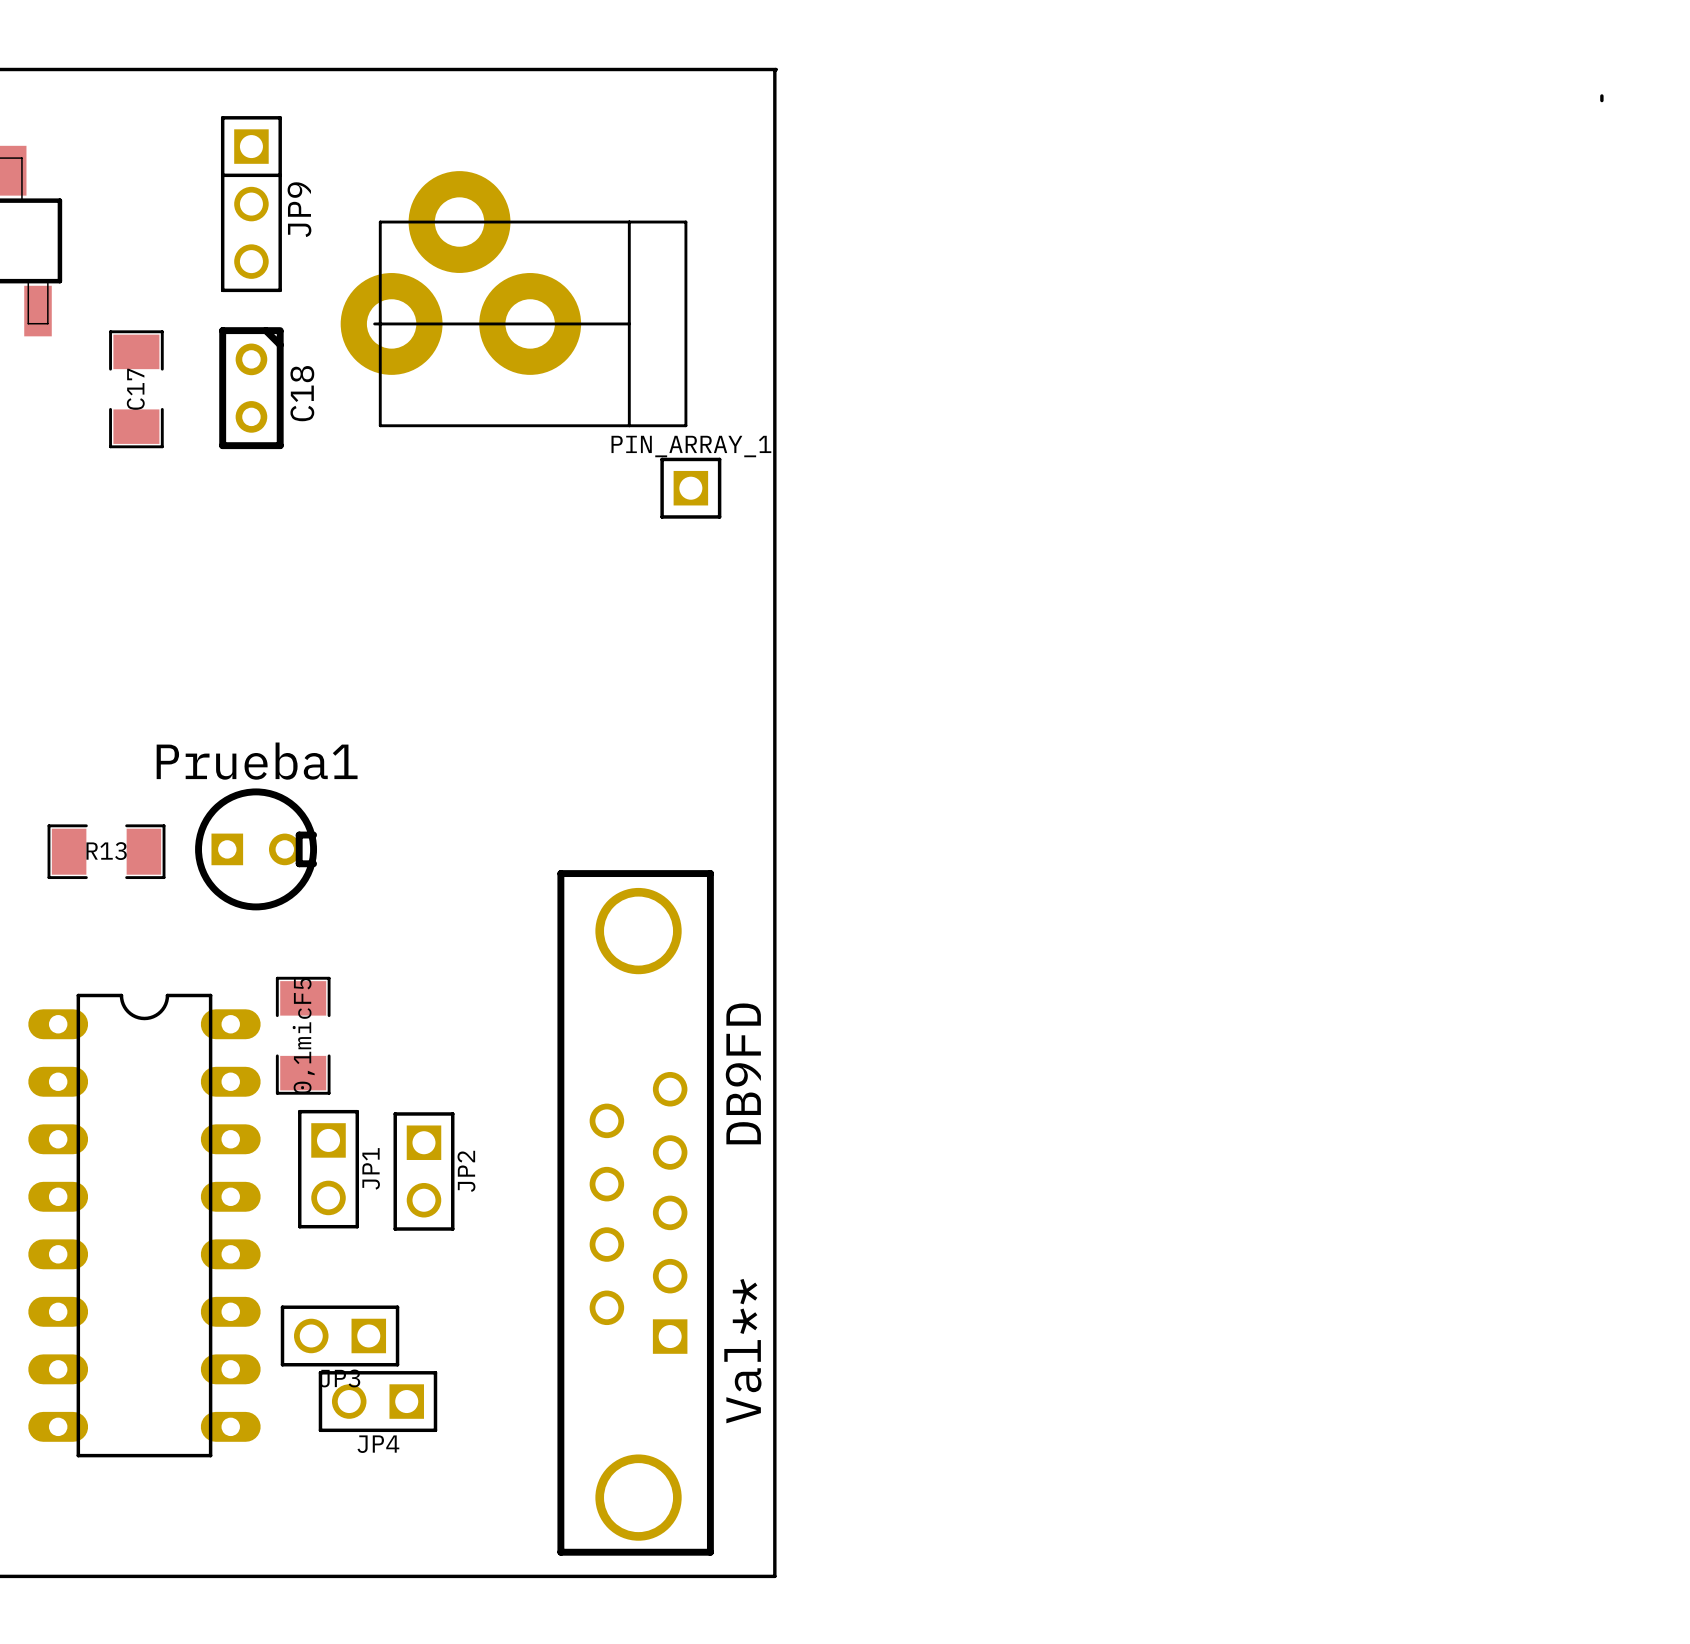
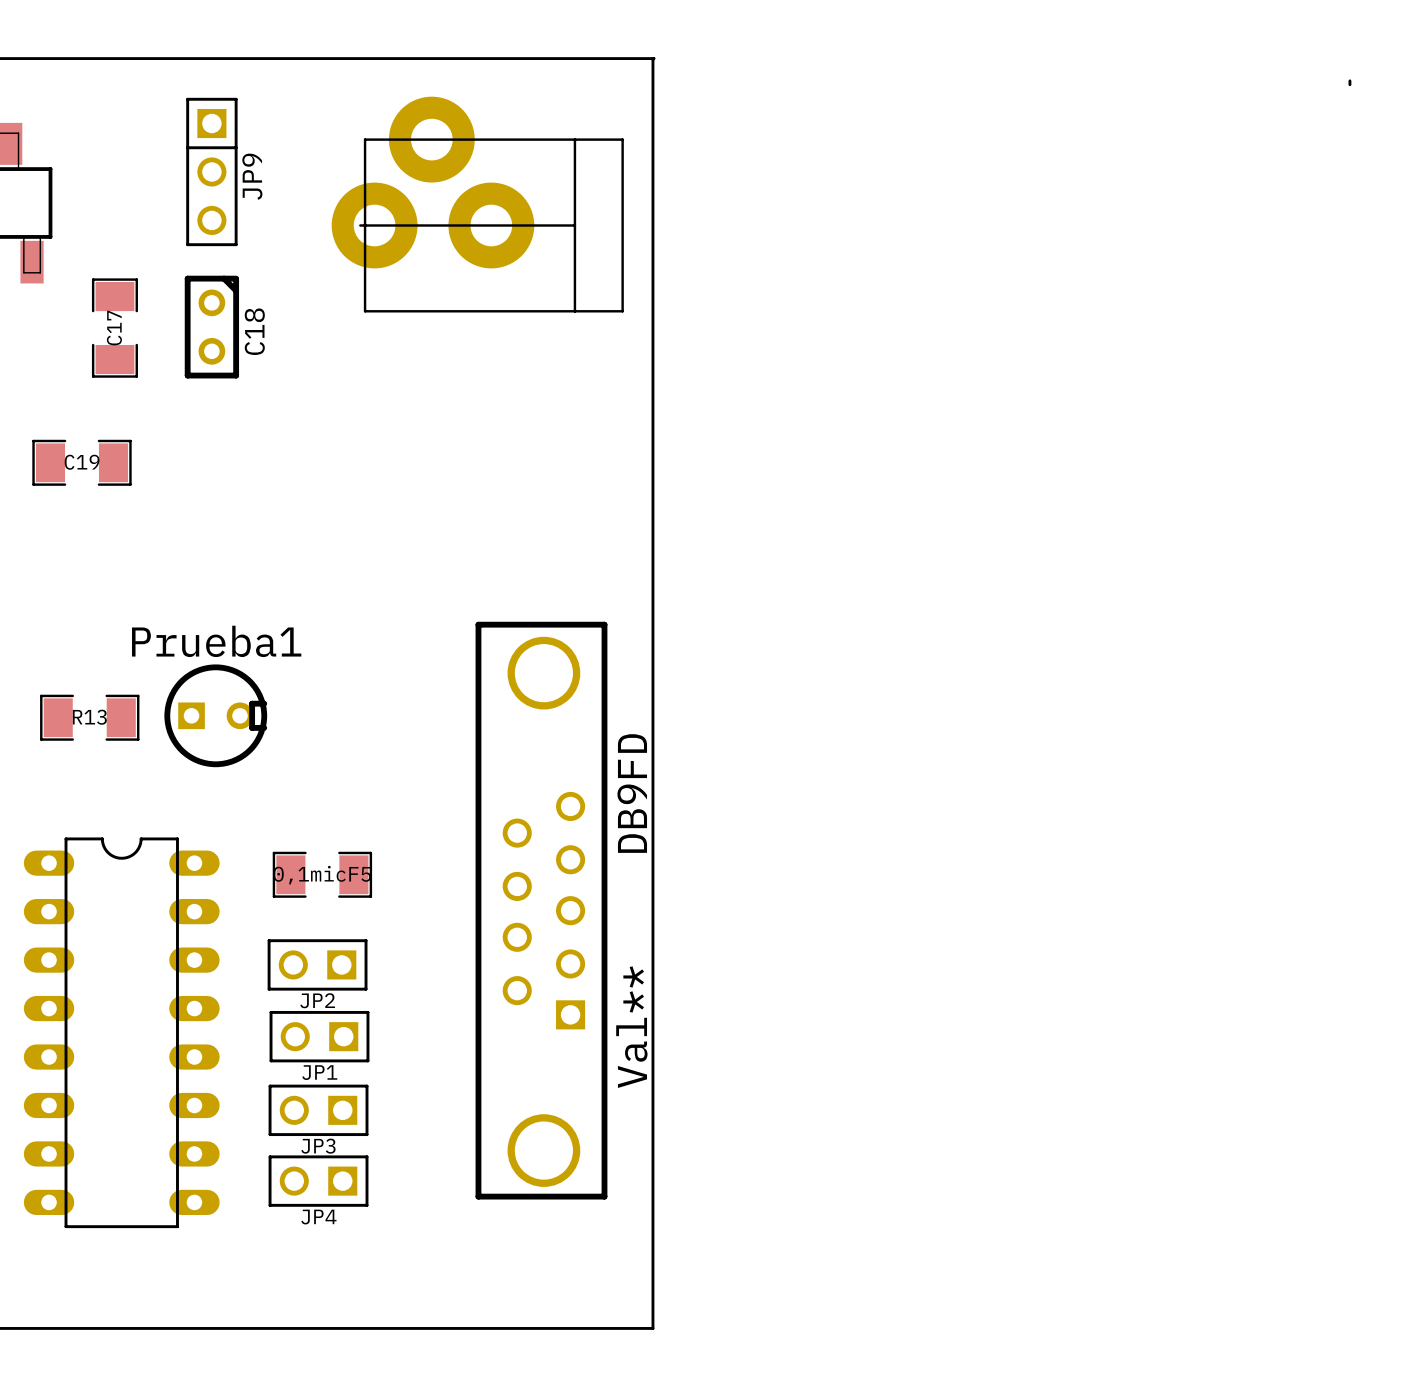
part position: (514, 299) -> (477, 204)
PIN_ARRAY_1: (690, 488) -> none
C19: none -> (82, 462)
0,1micF5 rotation: 0° (303, 1035) -> 90° clockwise (322, 874)
0,1micF5 position: (303, 1035) -> (322, 874)
JP1 rotation: 0° (328, 1169) -> 90° clockwise (319, 1036)
JP1 position: (328, 1169) -> (319, 1036)
JP2 rotation: 0° (423, 1171) -> 90° clockwise (317, 964)
DB9FD position: (635, 1212) -> (541, 910)
JP3 position: (340, 1335) -> (318, 1110)

